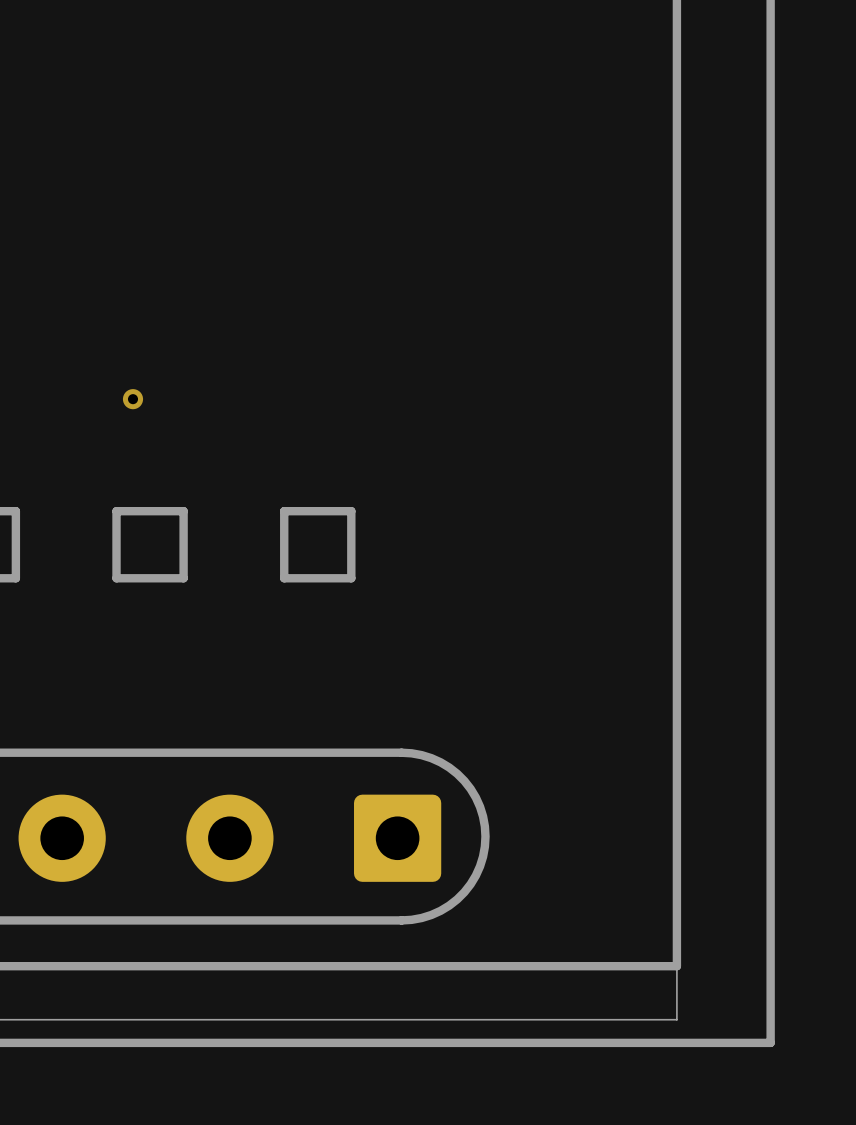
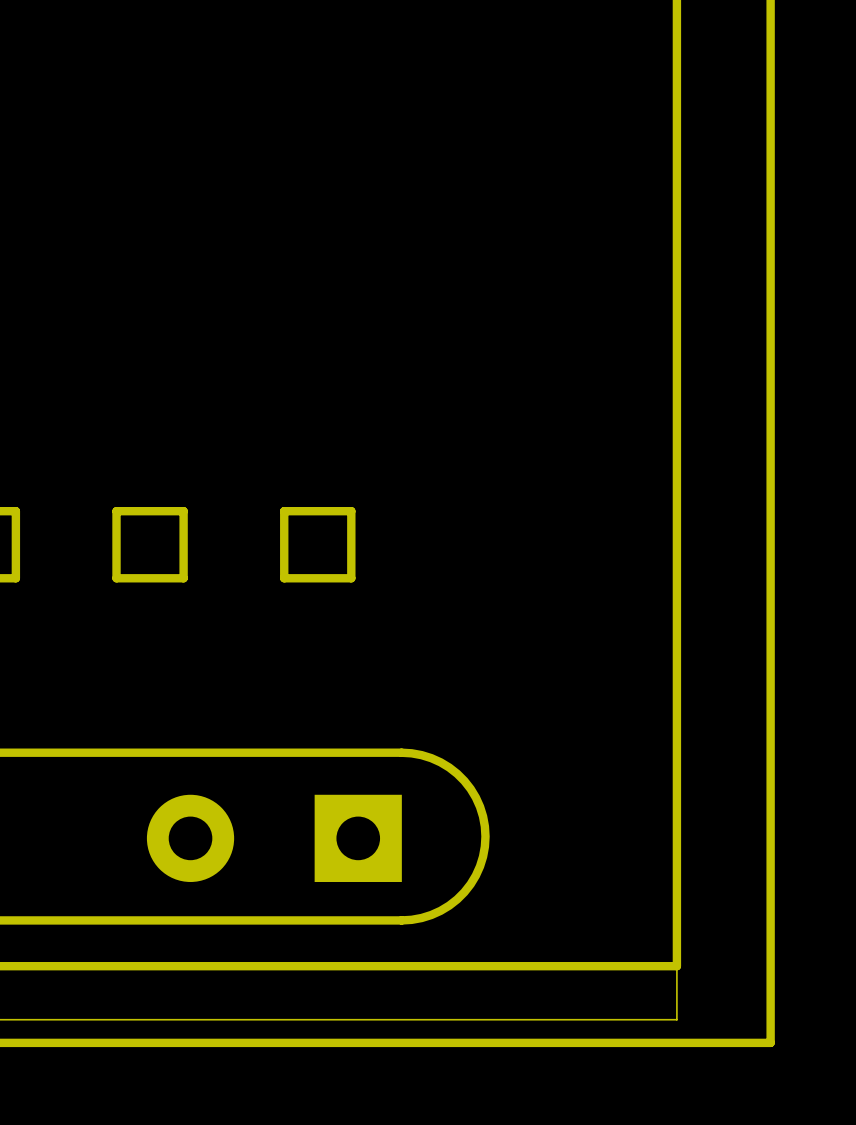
via: (132, 399) -> none
part: (229, 838) -> none
part: none -> (274, 838)

